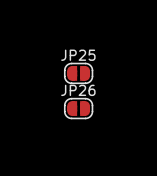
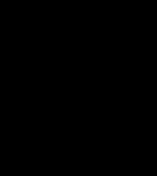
JP25: (78, 73) -> none
JP26: (78, 108) -> none

